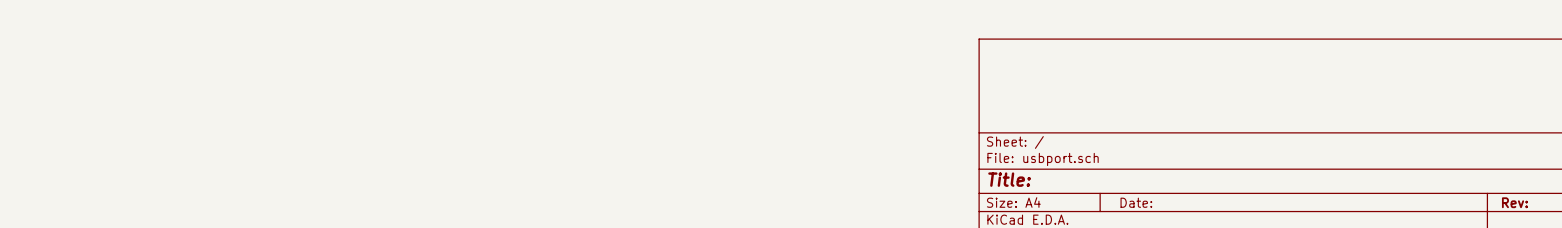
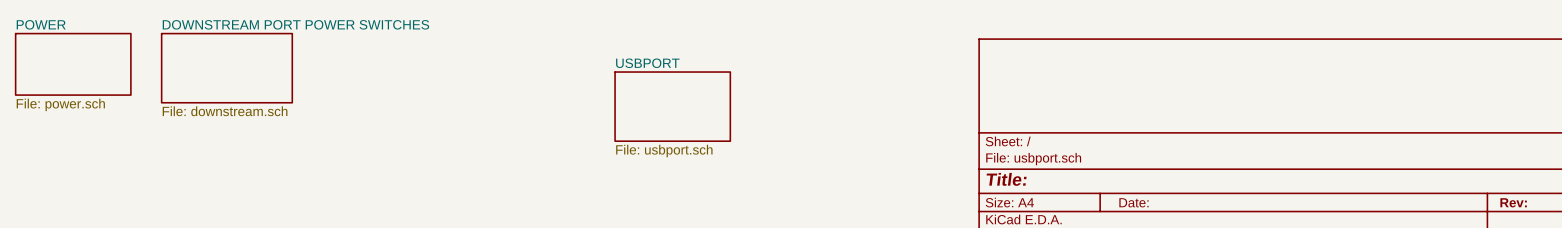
sheet POWER: none -> File: power.sch (73, 64)
sheet DOWNSTREAM PORT POWER SWITCHES: none -> File: downstream.sch (226, 68)
sheet USBPORT: none -> File: usbport.sch (672, 106)

